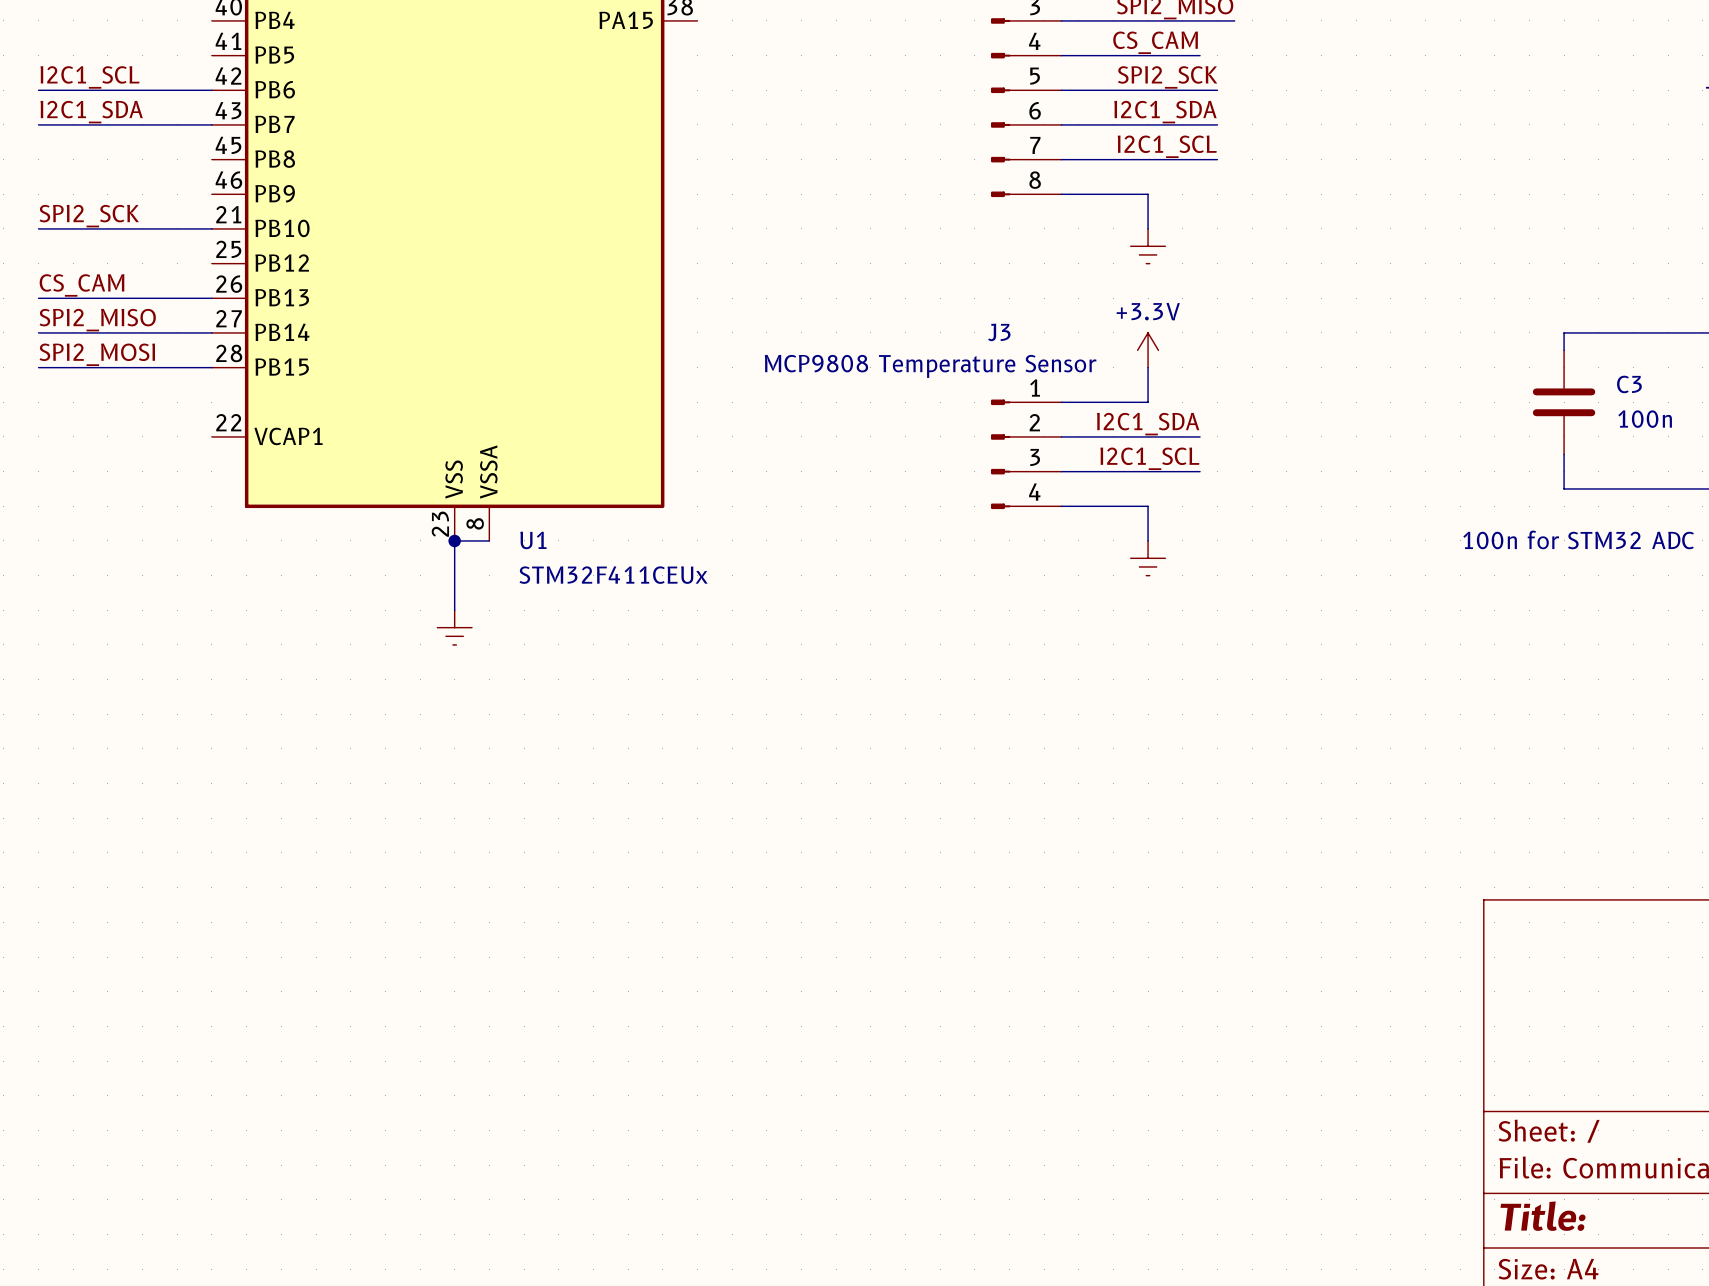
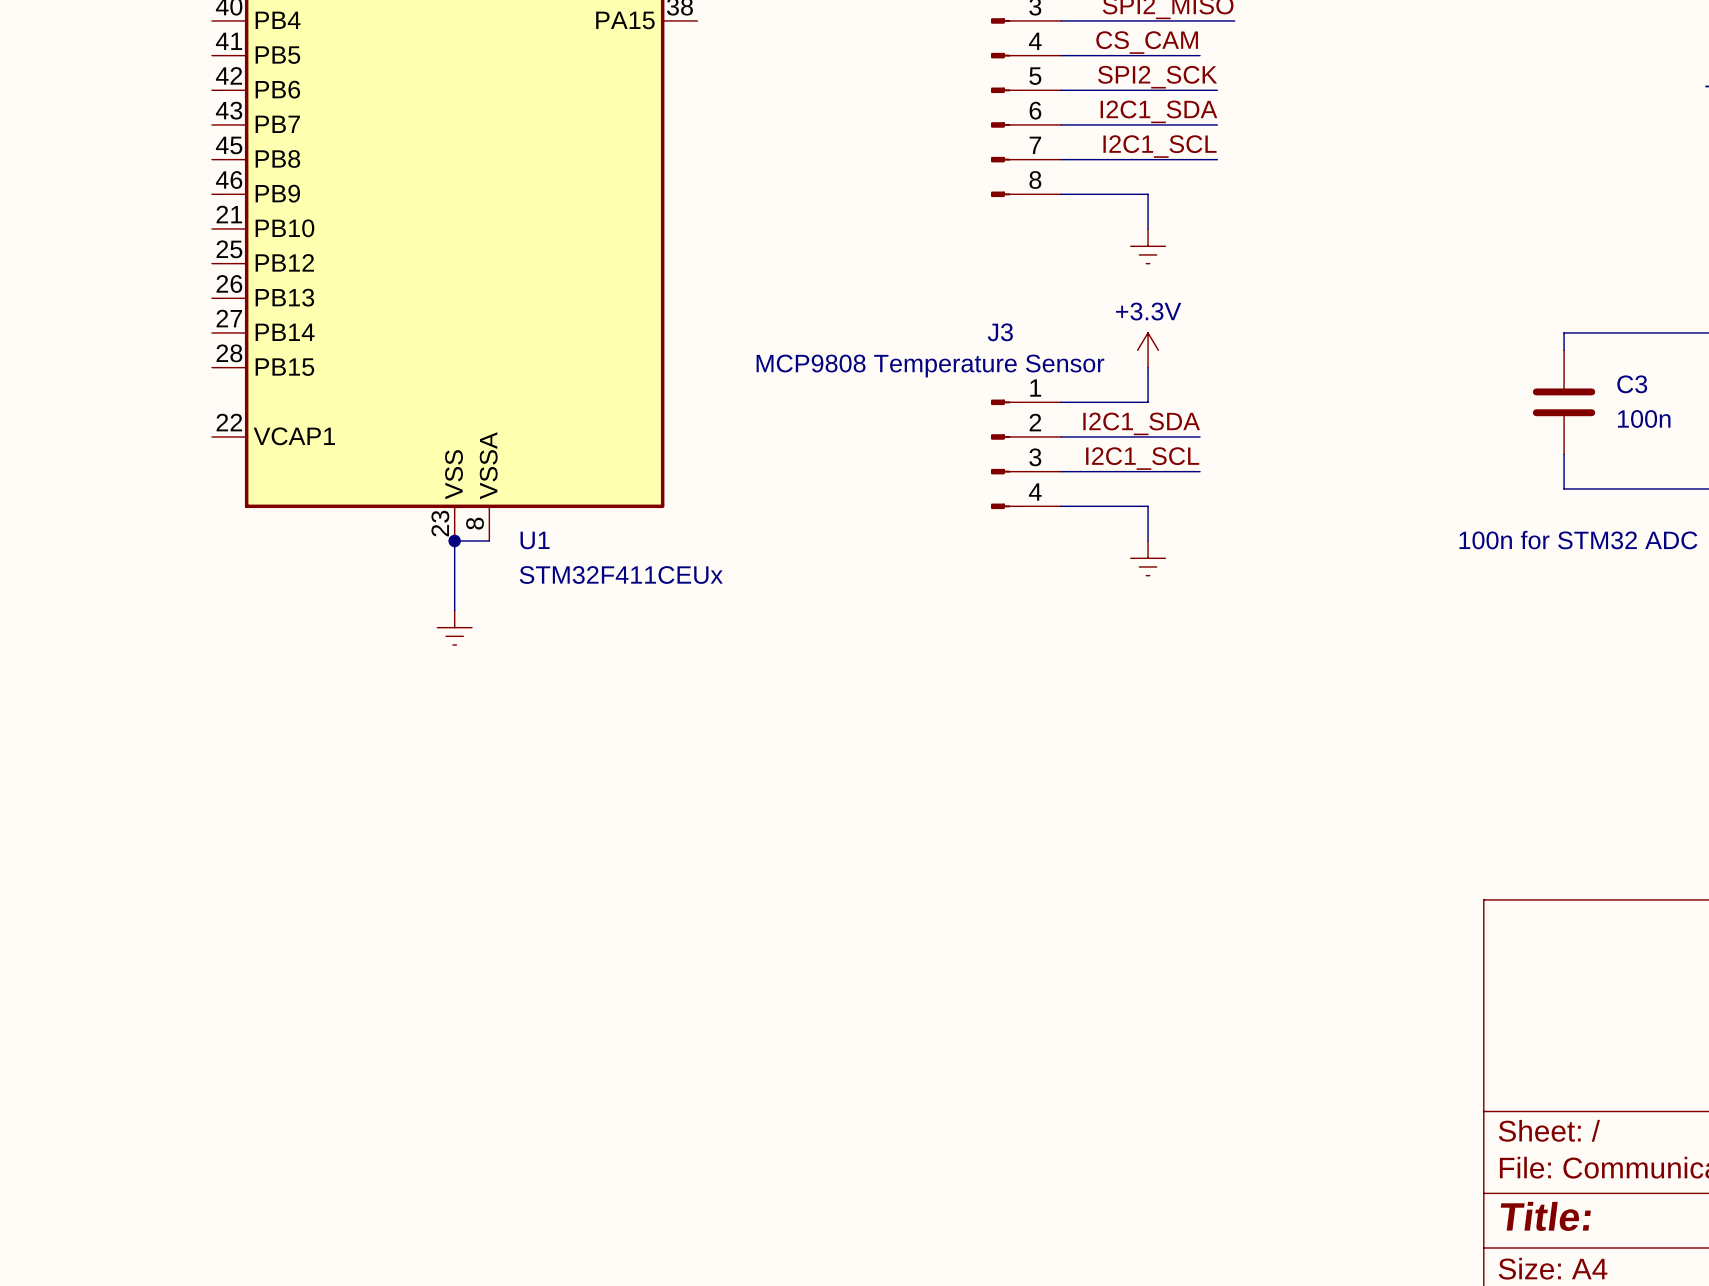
label: I2C1_SCL (89, 77) -> none
wire: (38, 90) (211, 90) -> none
label: I2C1_SDA (91, 112) -> none
wire: (38, 124) (211, 124) -> none
label: SPI2_SCK (89, 216) -> none
wire: (38, 228) (211, 228) -> none
label: CS_CAM (81, 285) -> none
wire: (38, 298) (211, 298) -> none
label: SPI2_MISO (97, 320) -> none
wire: (38, 332) (211, 332) -> none
label: SPI2_MOSI (97, 354) -> none
wire: (38, 367) (211, 367) -> none

